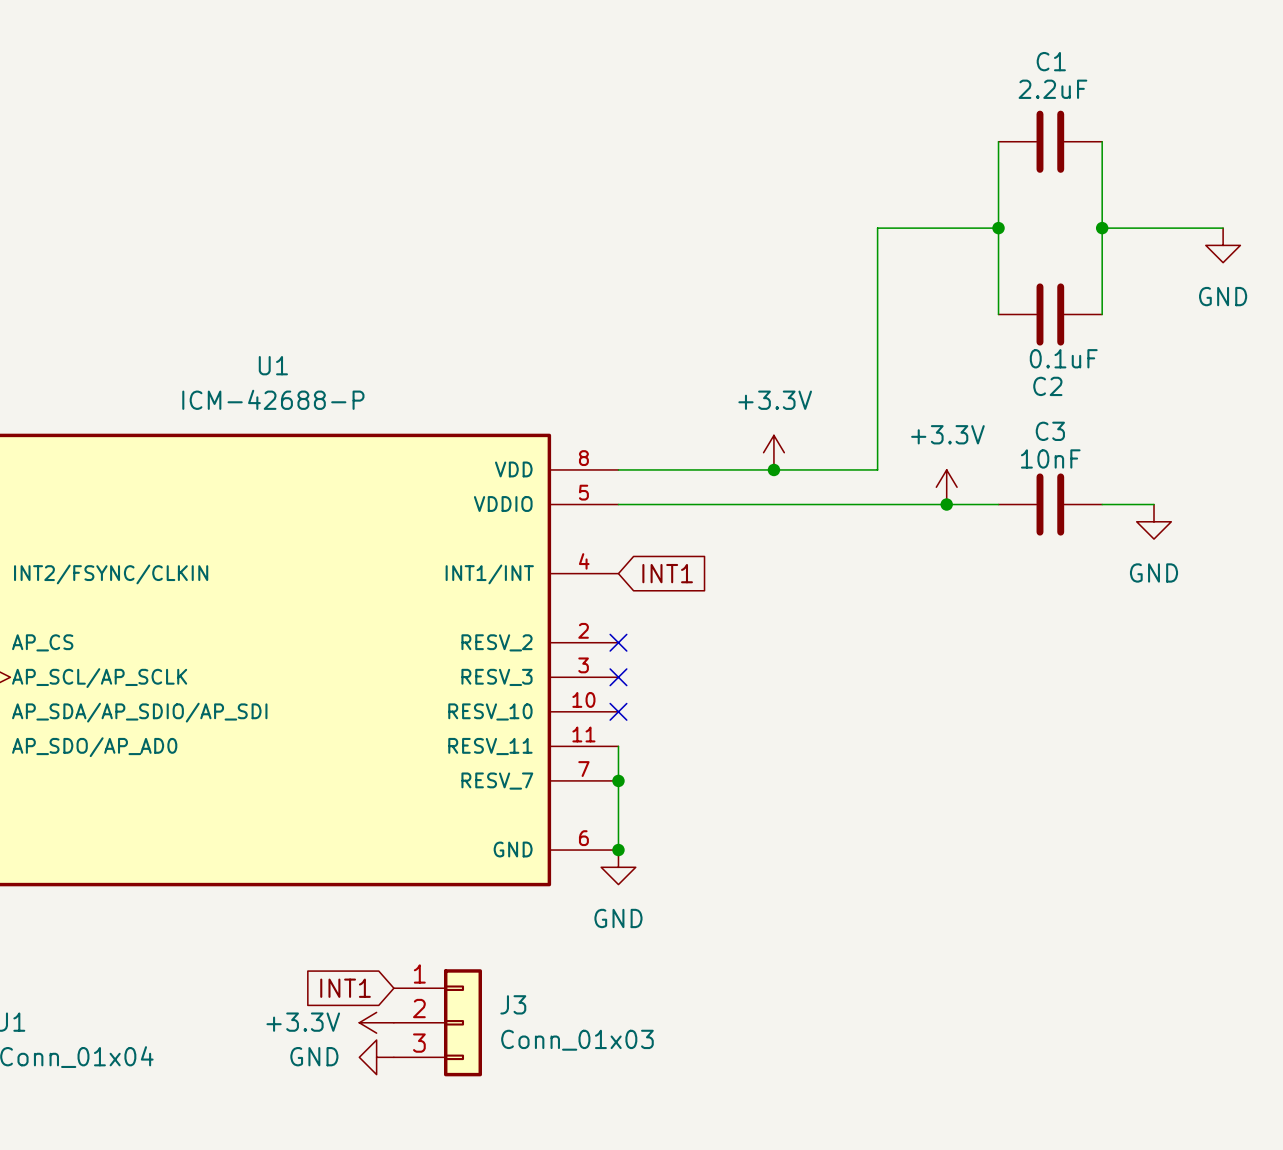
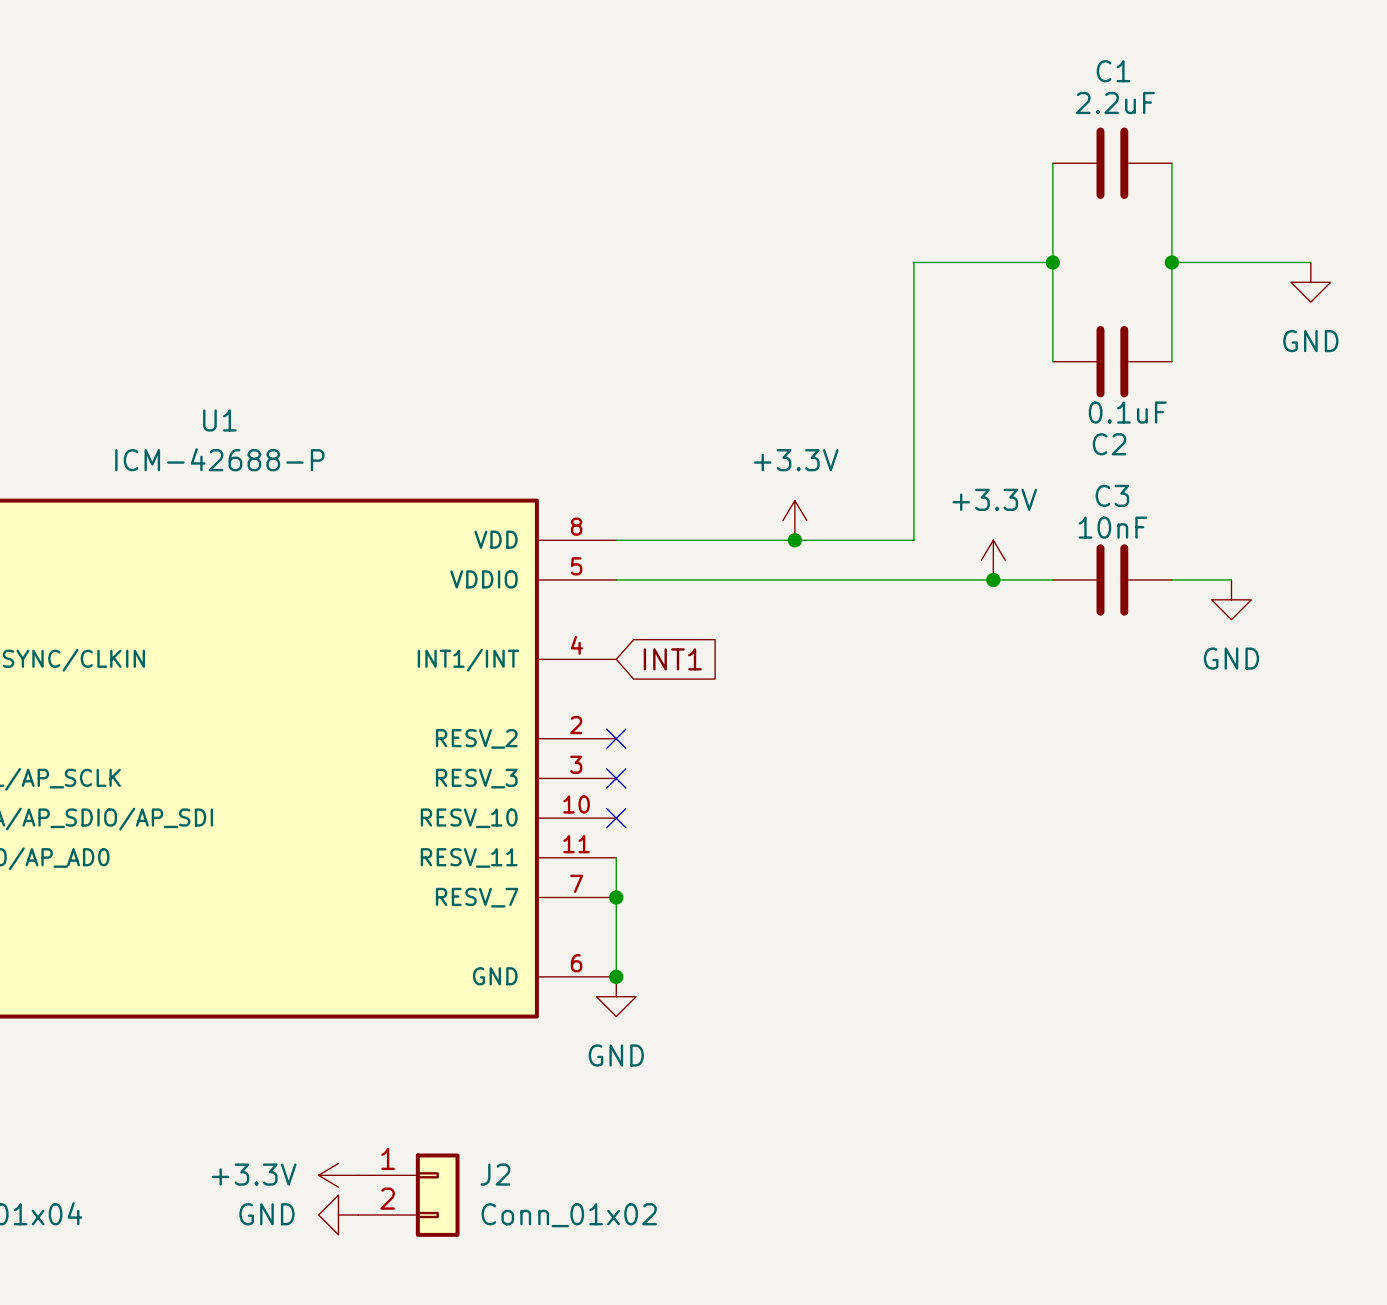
global label: INT1 (345, 988) -> none
J3: Conn_01x03 (437, 1022) -> none
J2: none -> Conn_01x02 (408, 1195)

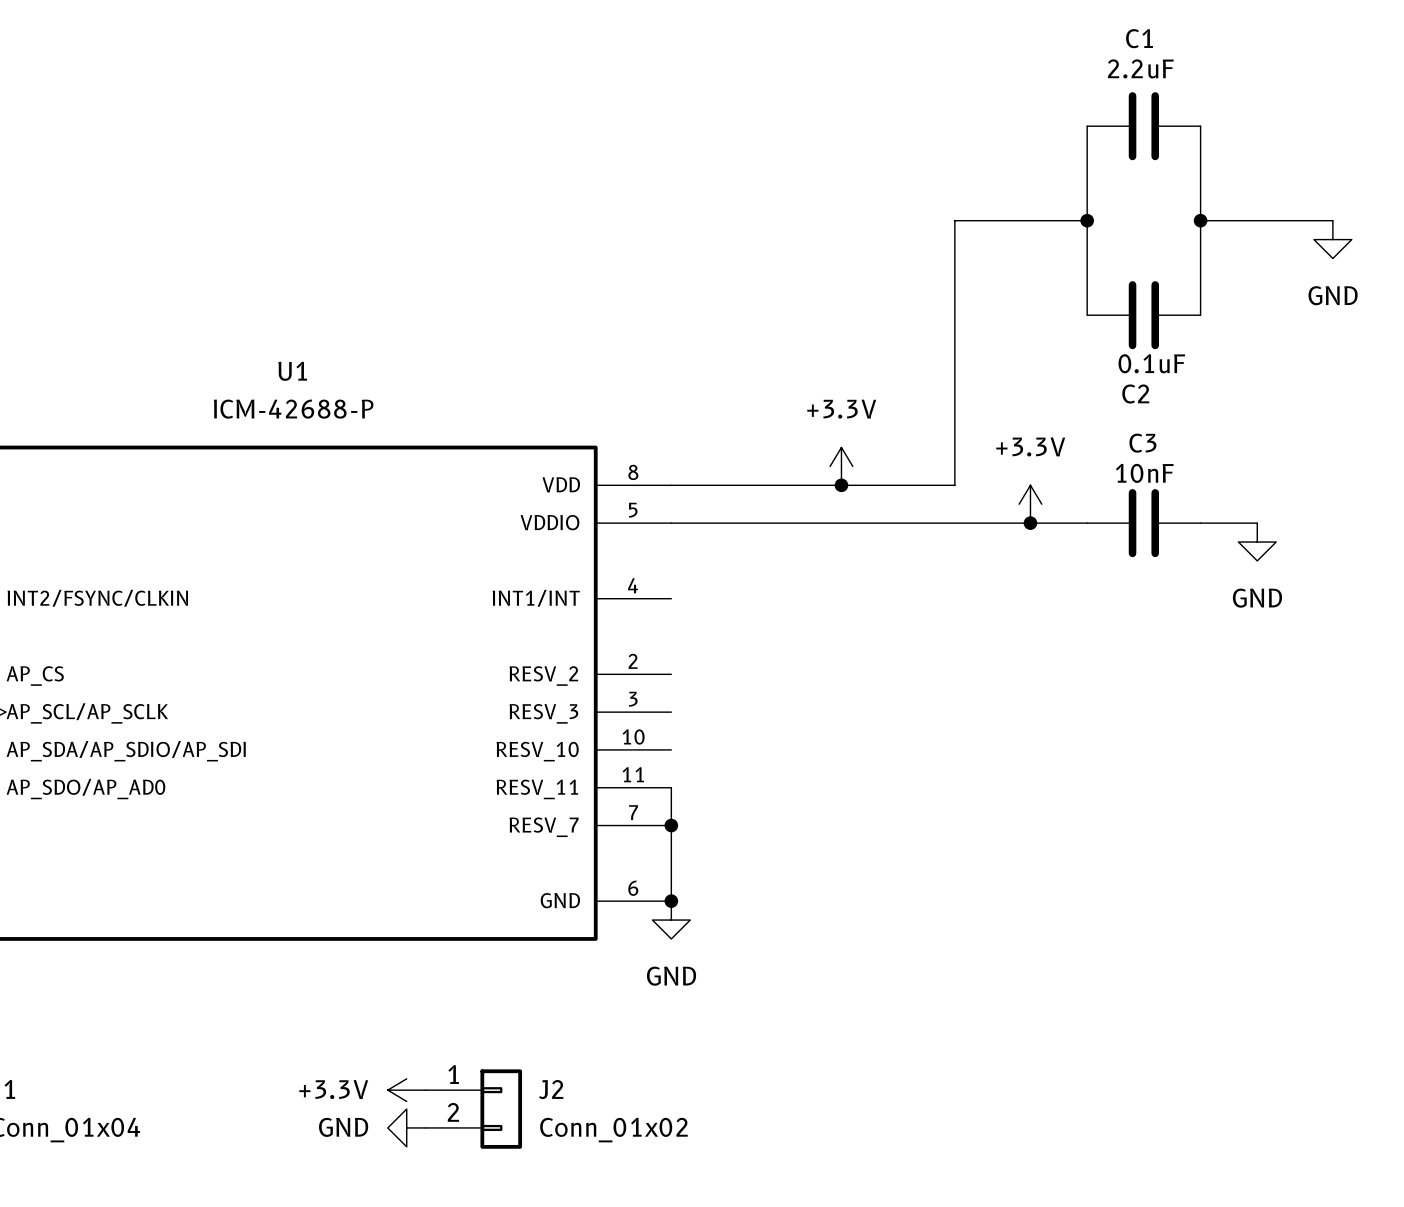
global label: INT1 (672, 659) -> none
no-connect mark: (616, 738) -> none
no-connect mark: (616, 778) -> none
no-connect mark: (616, 818) -> none

